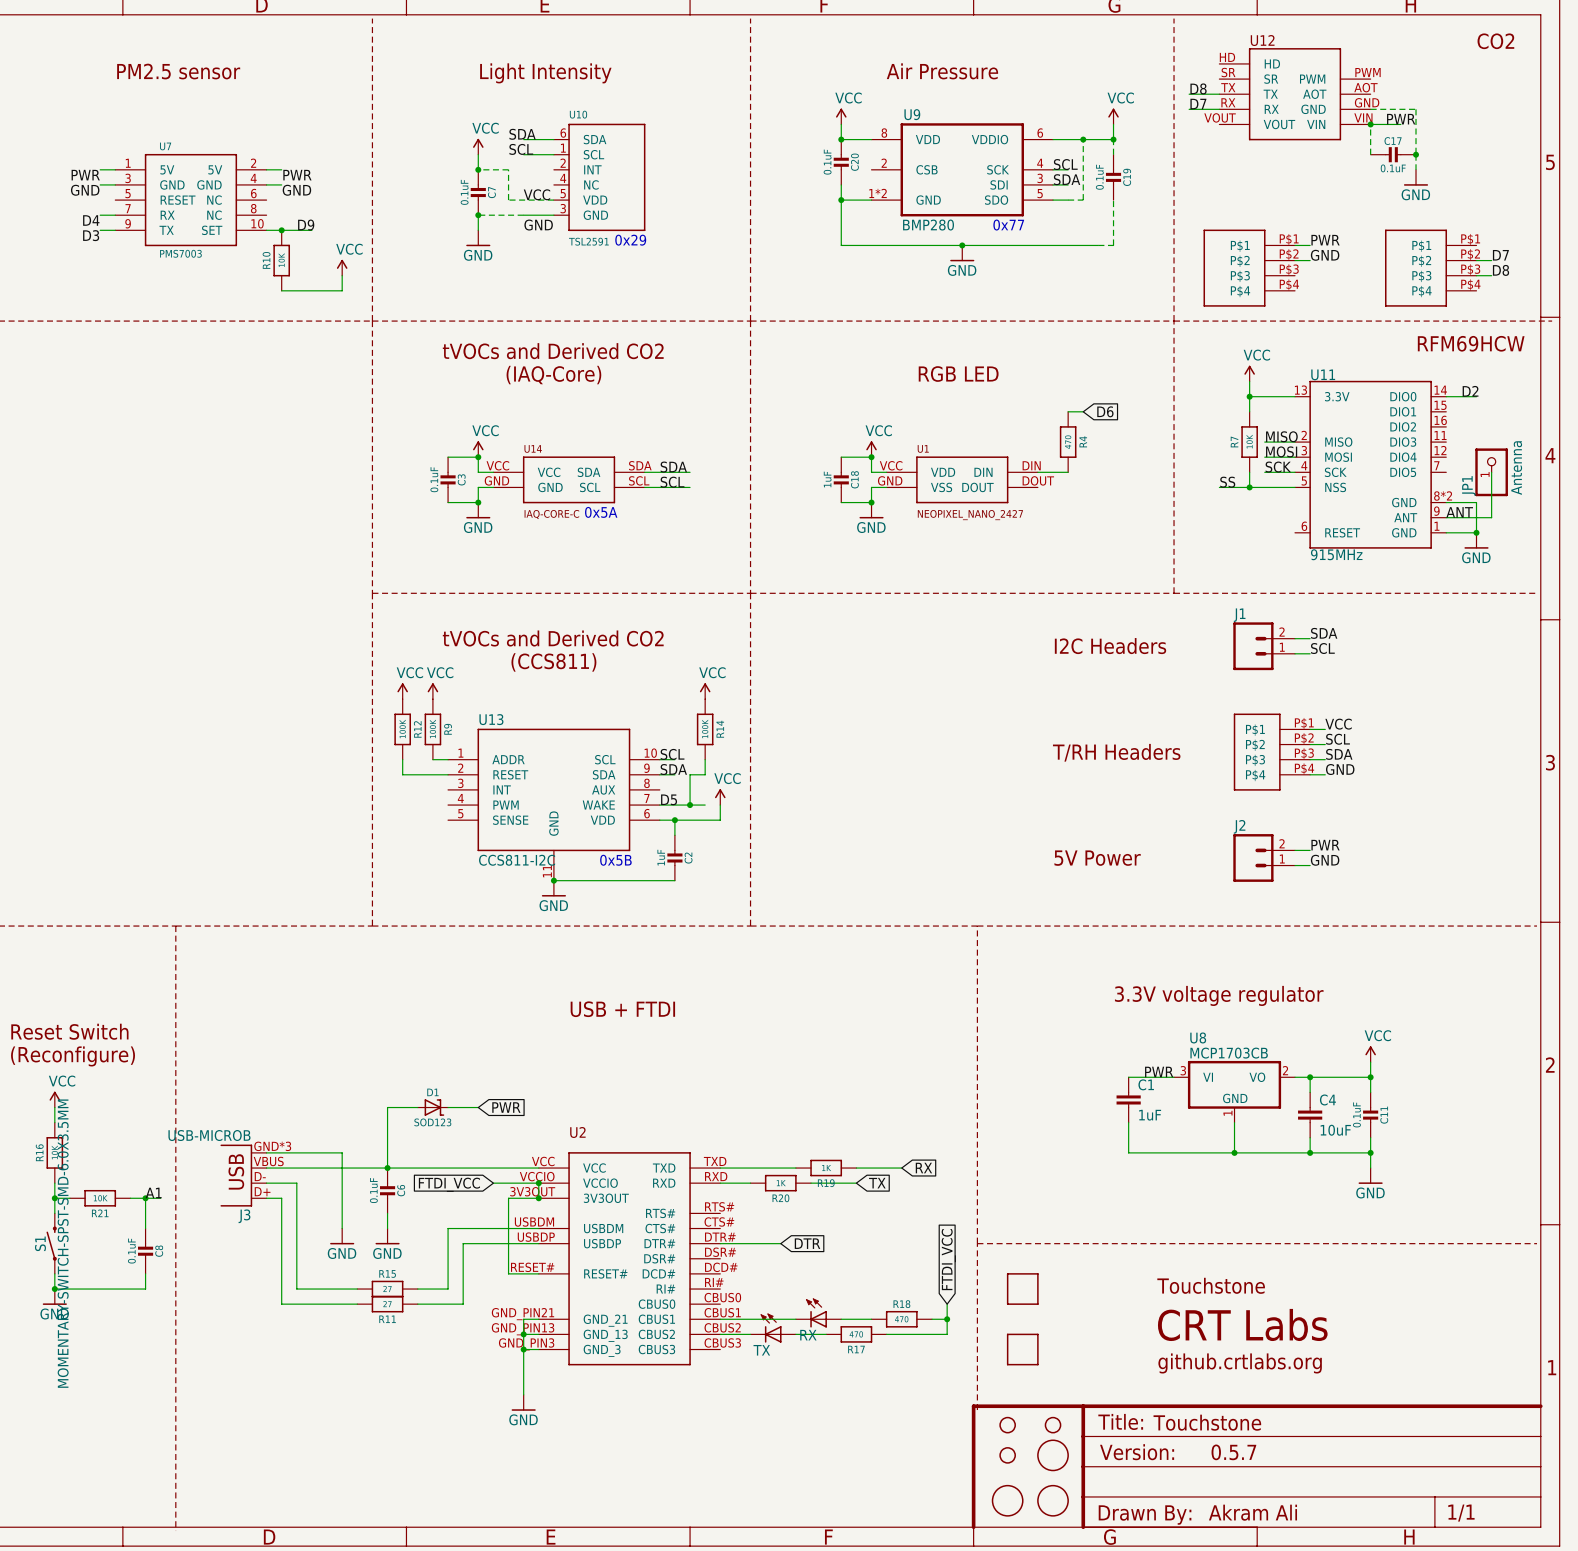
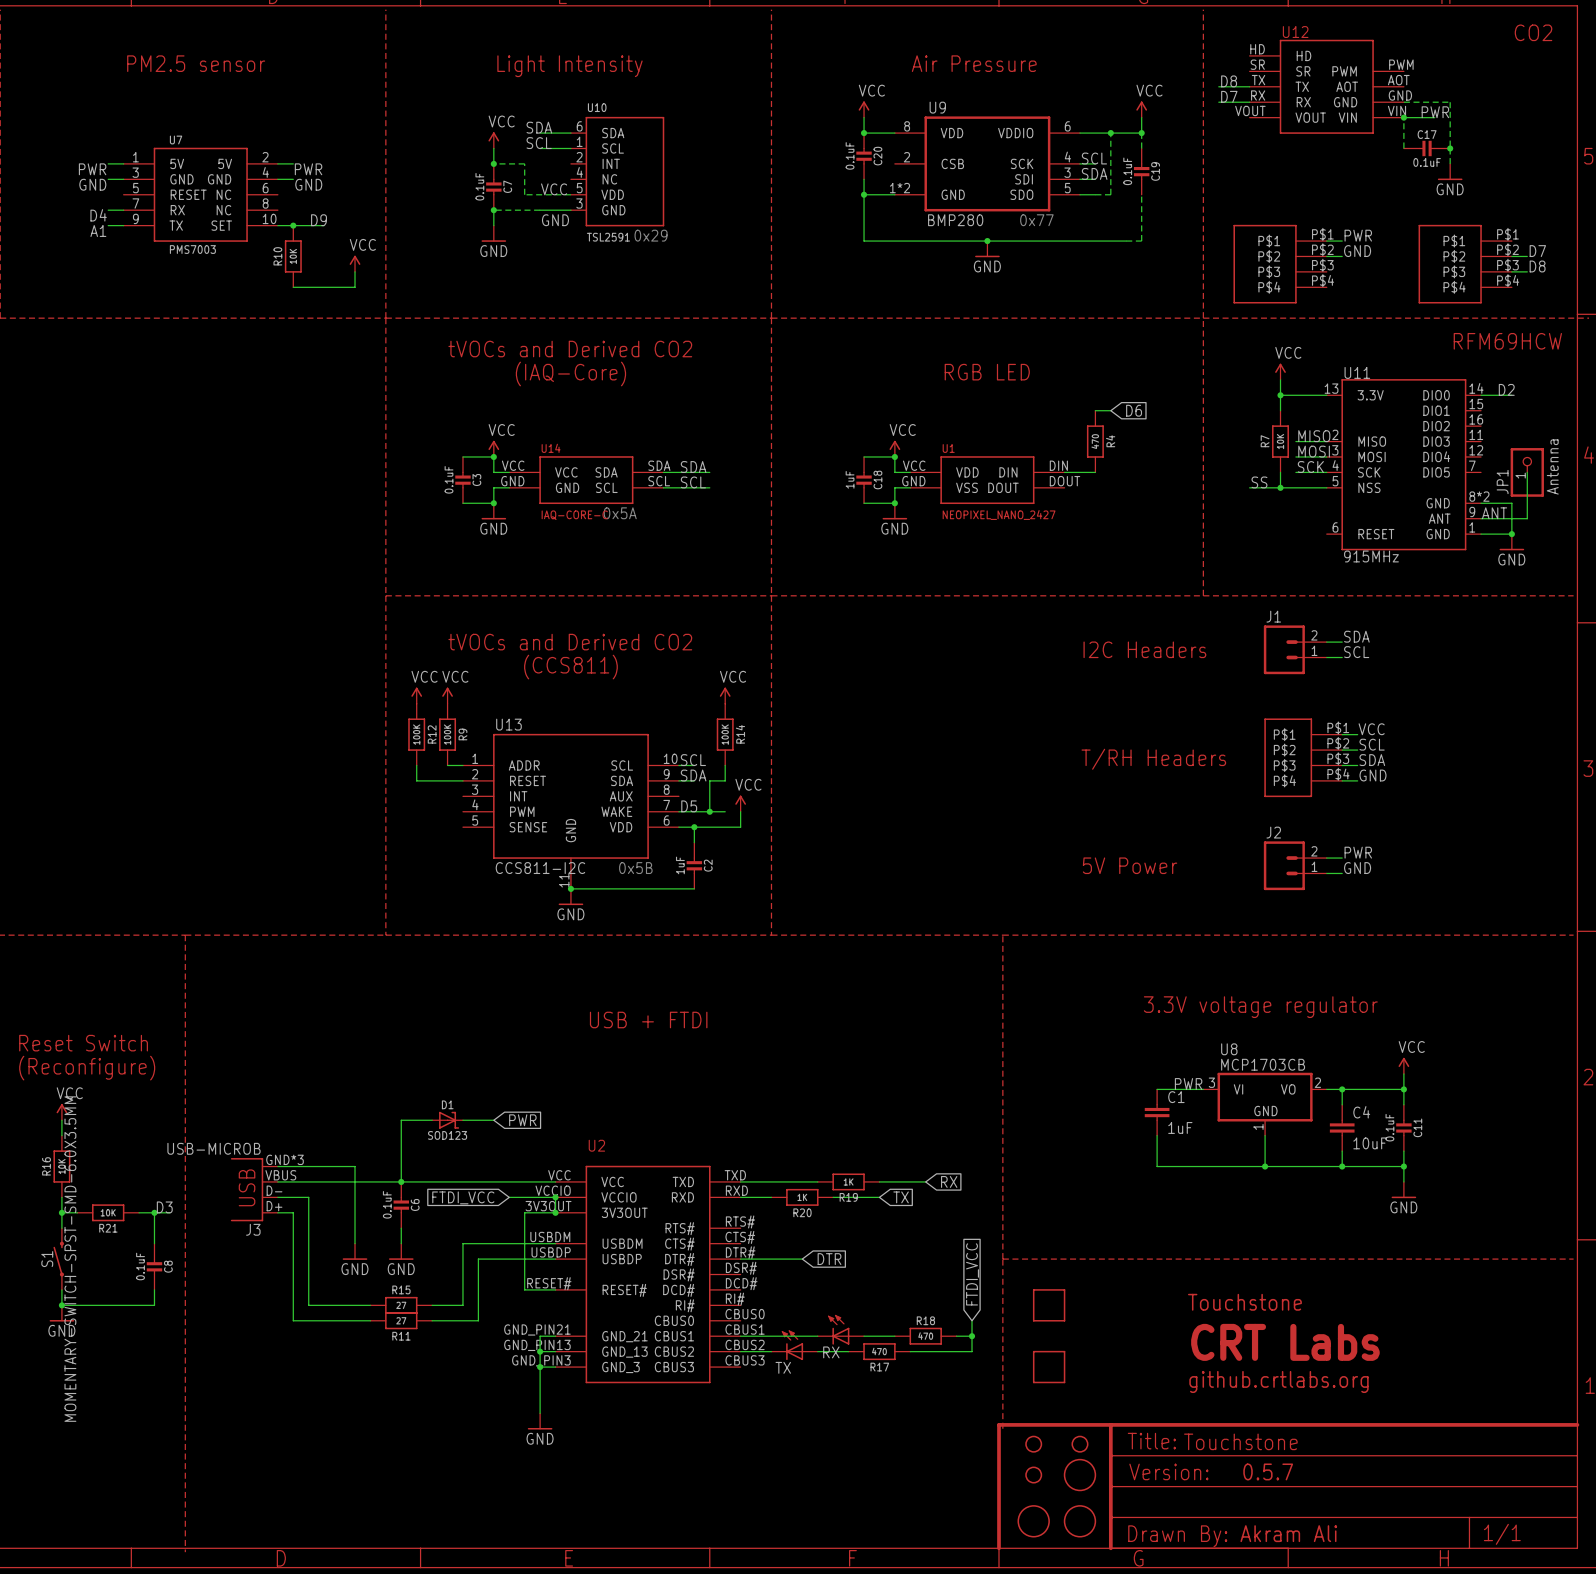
label: D3 (91, 235) -> A1 (98, 231)
label: A1 (153, 1192) -> D3 (164, 1207)

